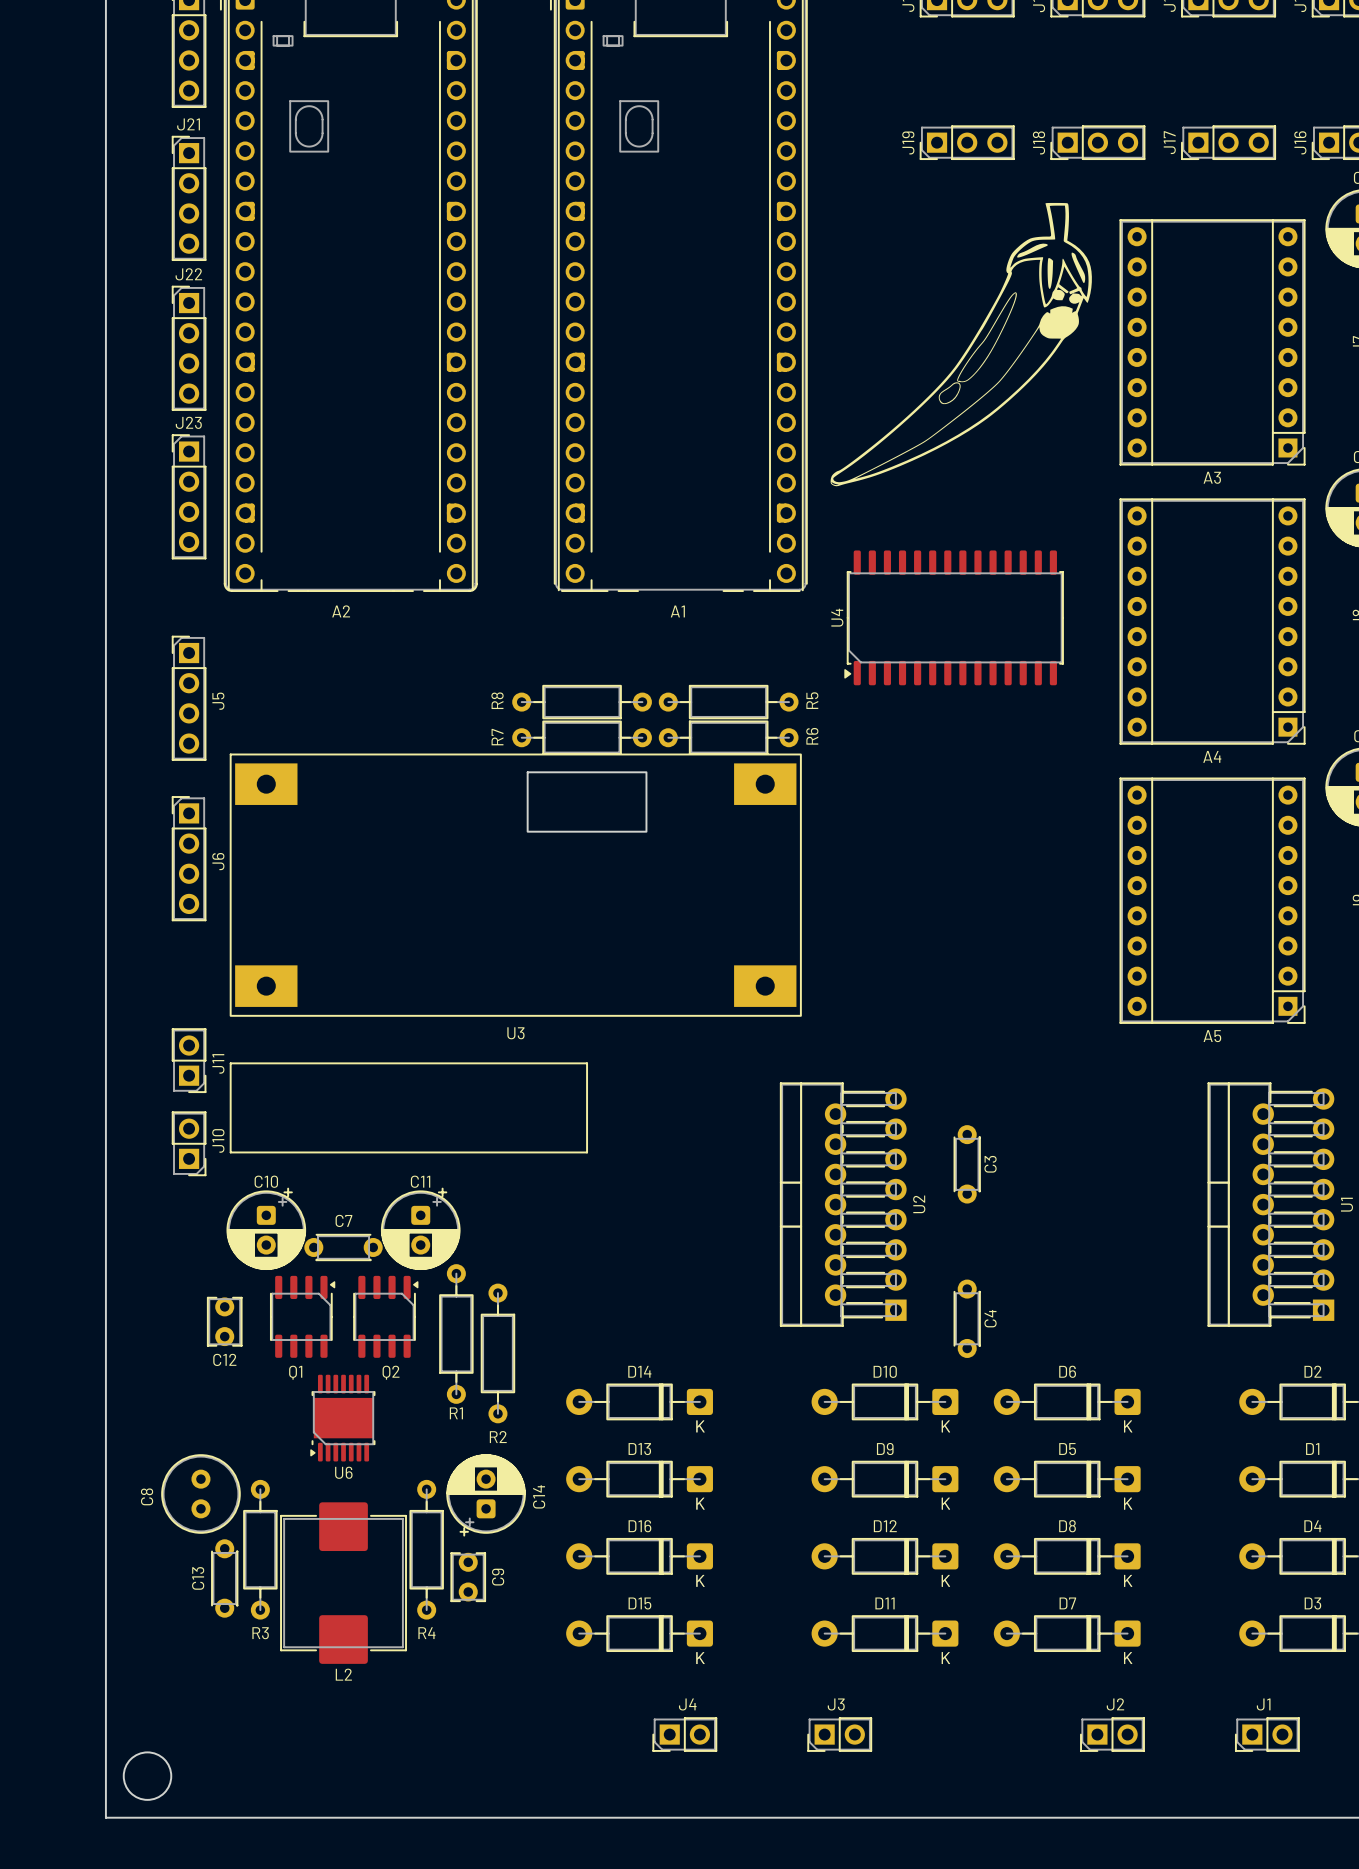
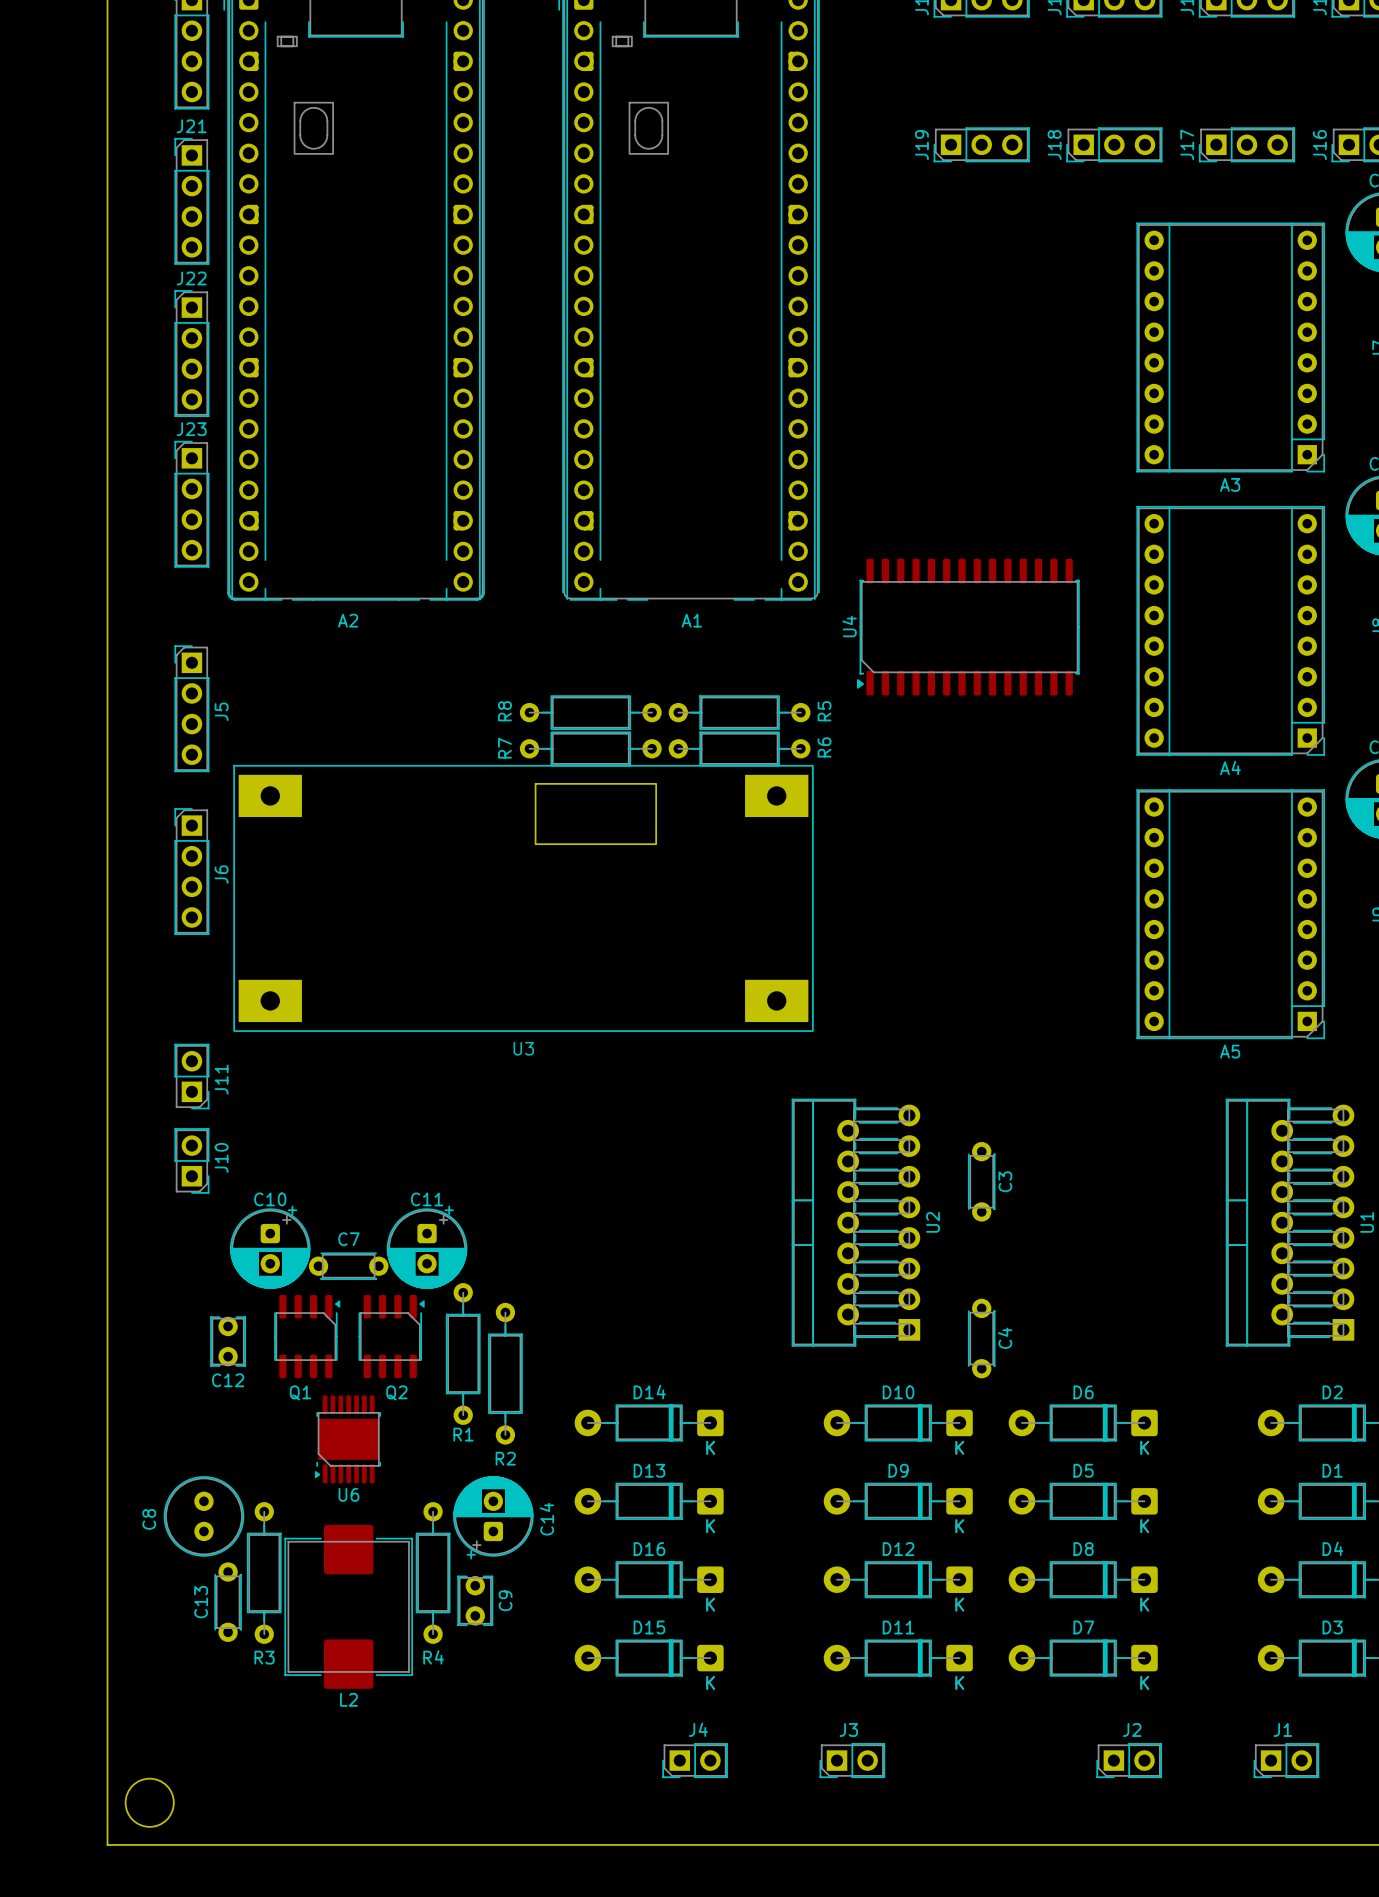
drawing: [830, 202, 1092, 487] -> none
line: (230, 1063) (587, 1063) (587, 1152) (230, 1152) (230, 1063) -> none

